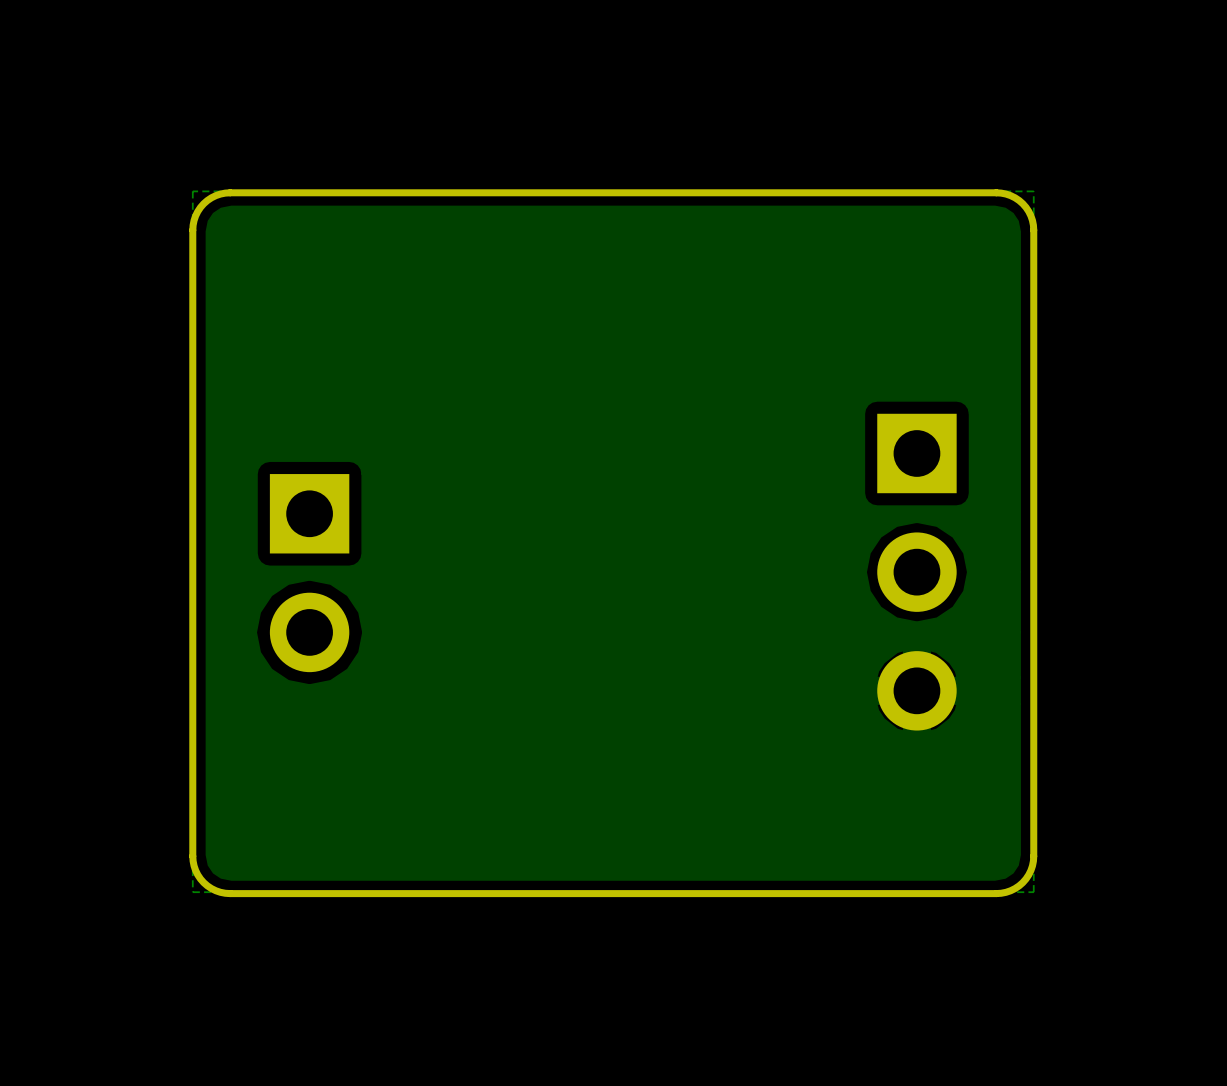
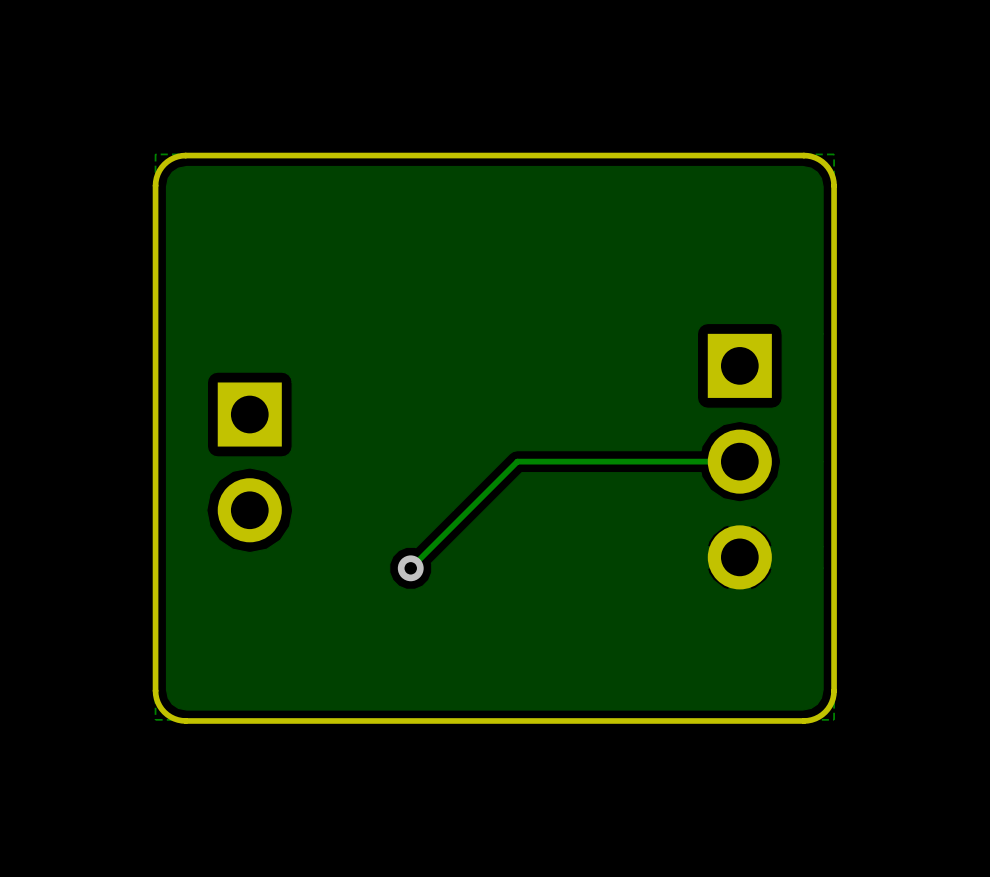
track: none -> (739, 461) (517, 461) (410, 568)
via: none -> (410, 568)

